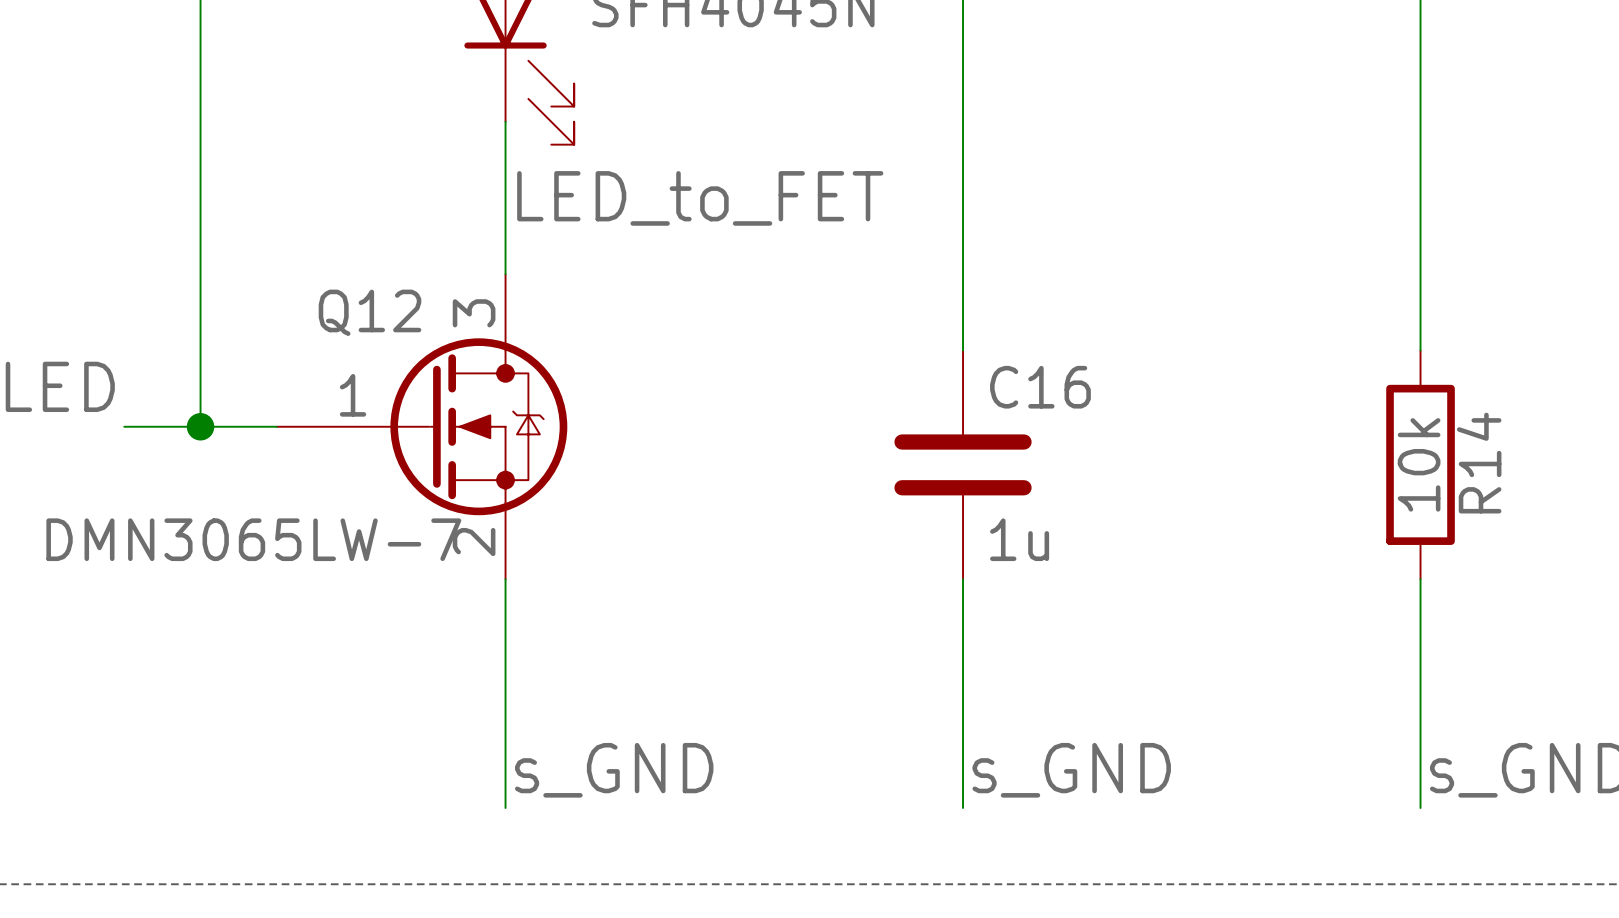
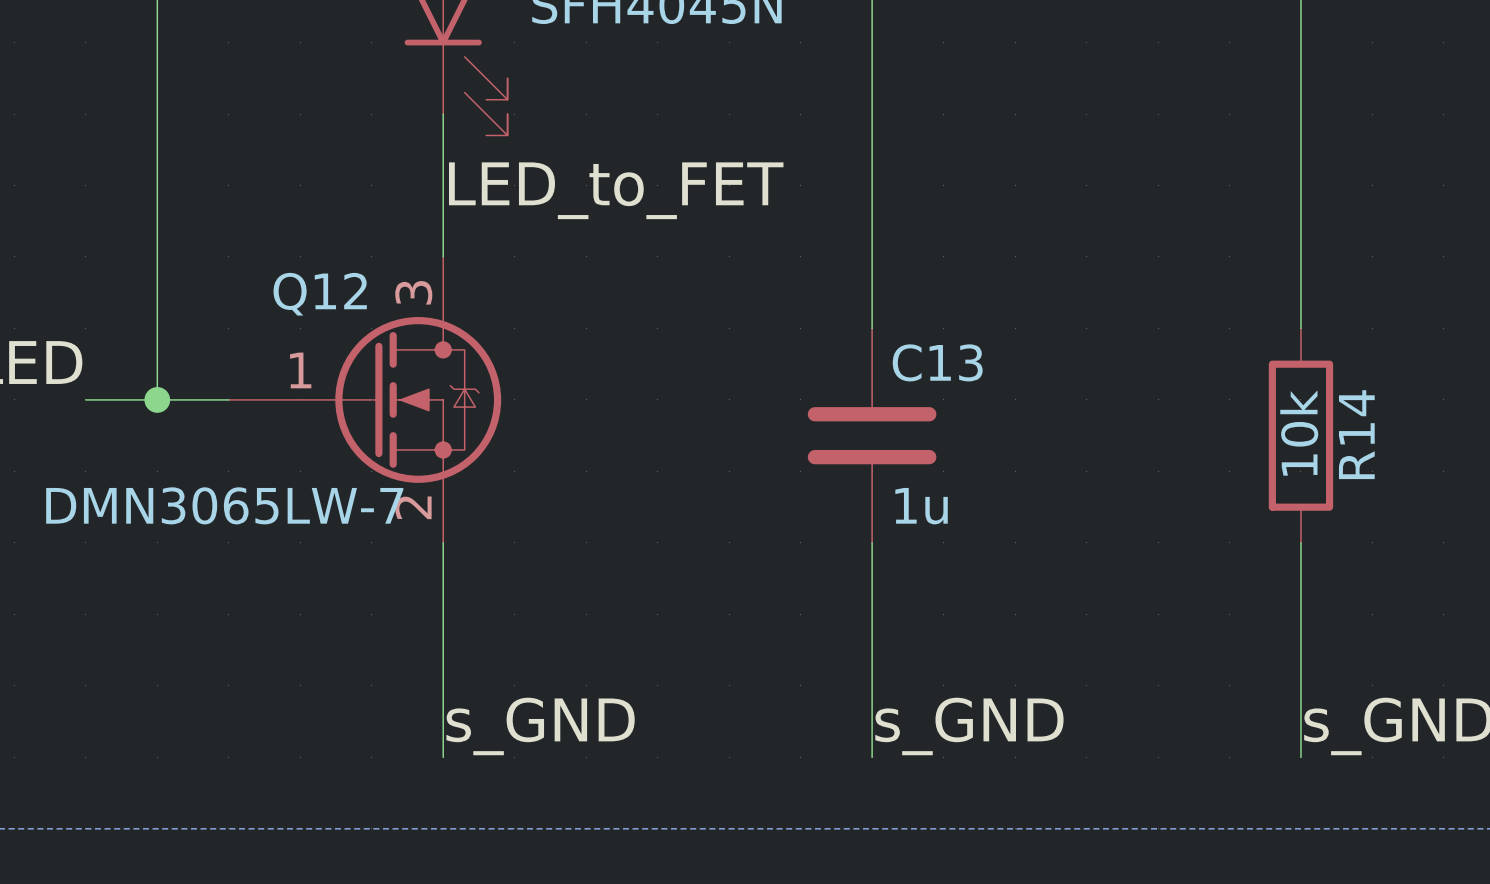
C16 name: C16 (1040, 387) -> C13 (937, 362)

